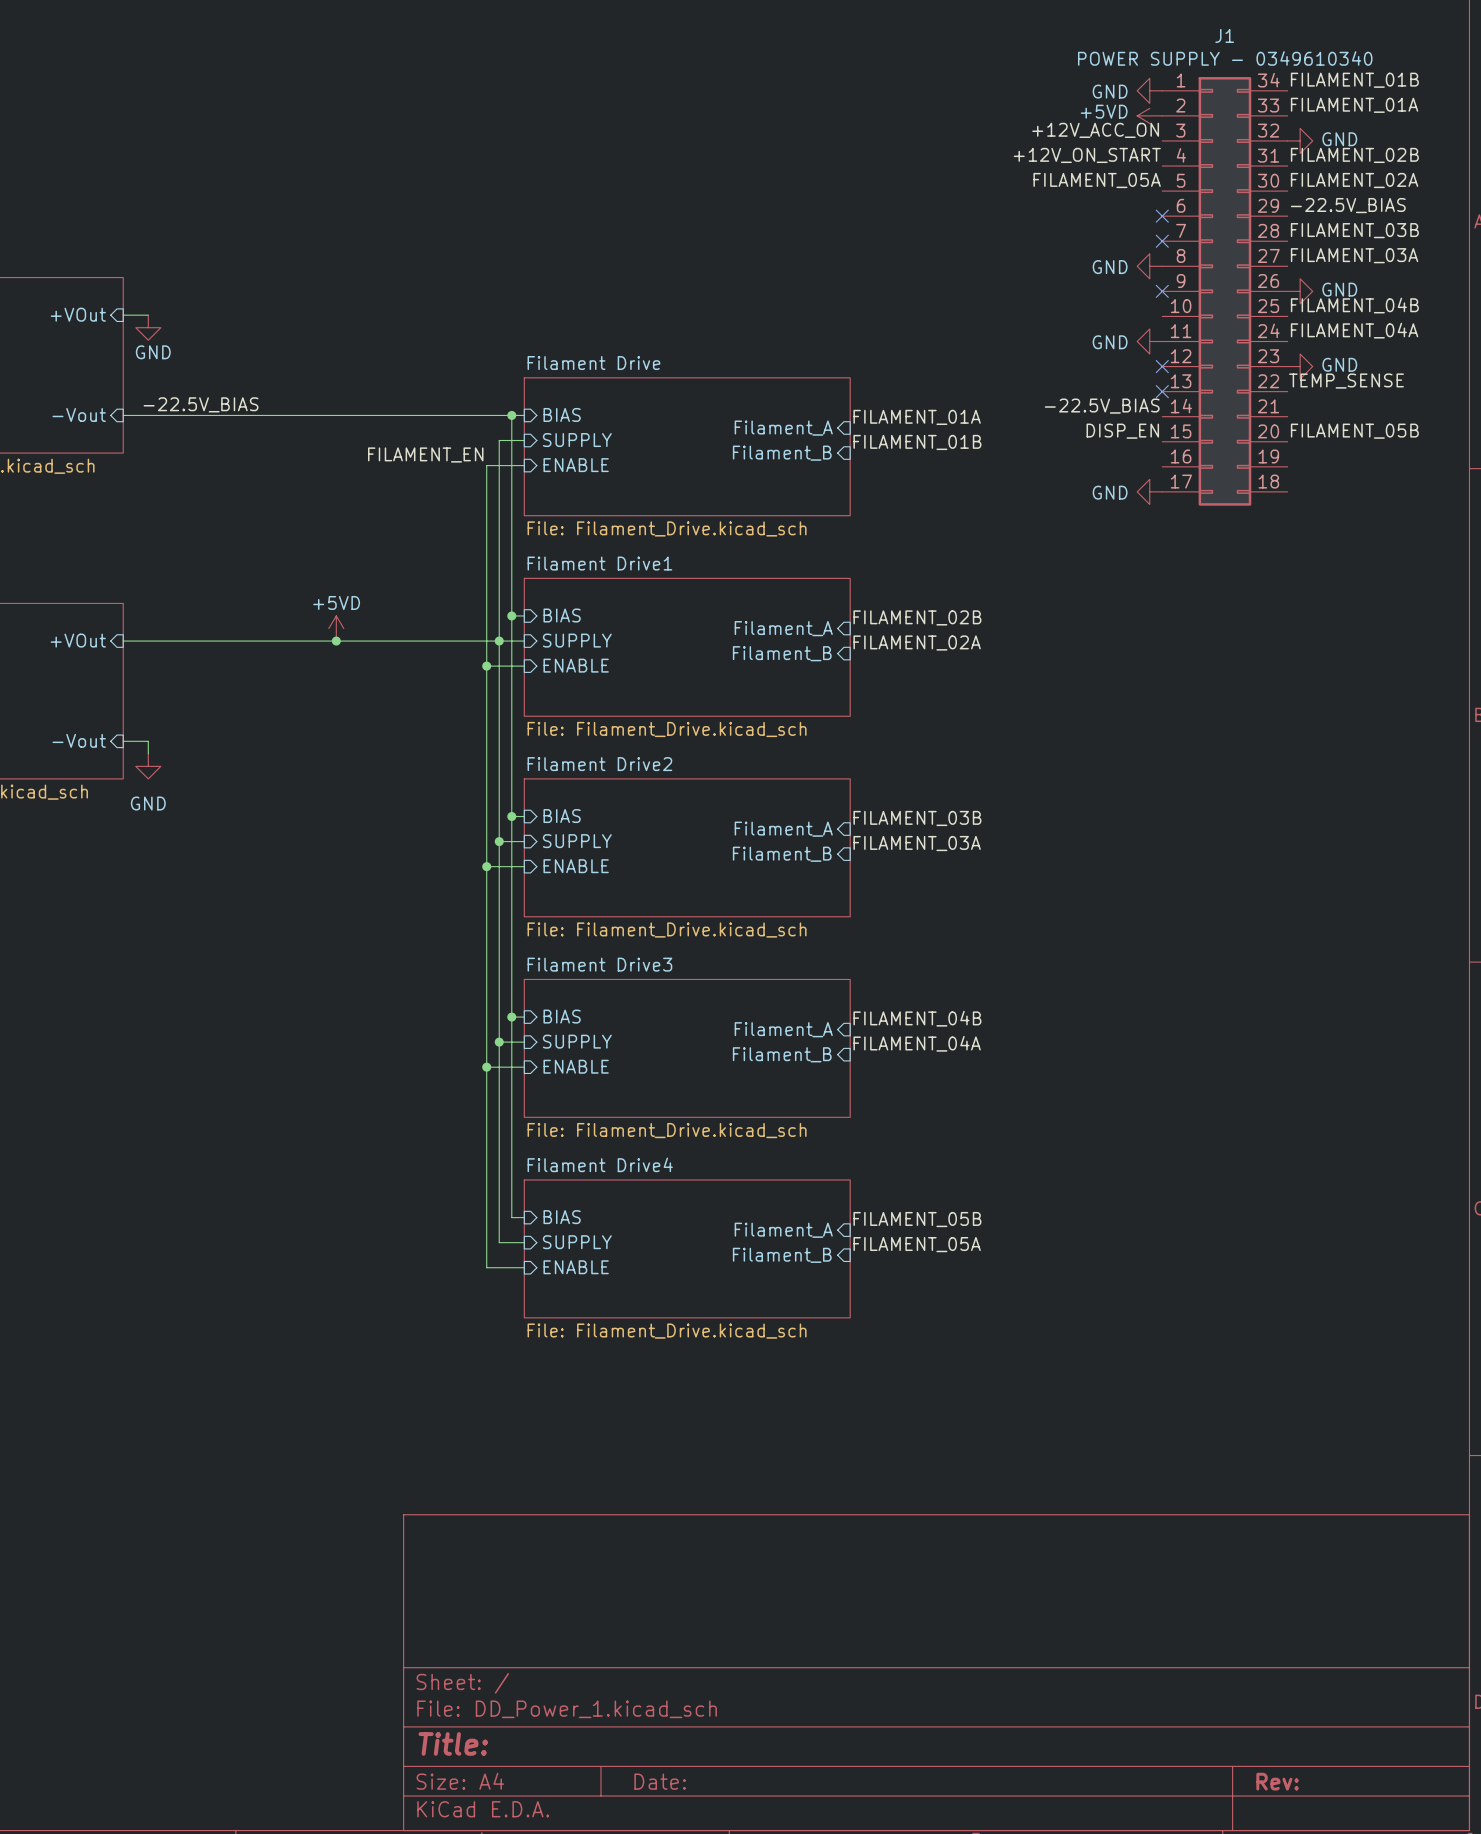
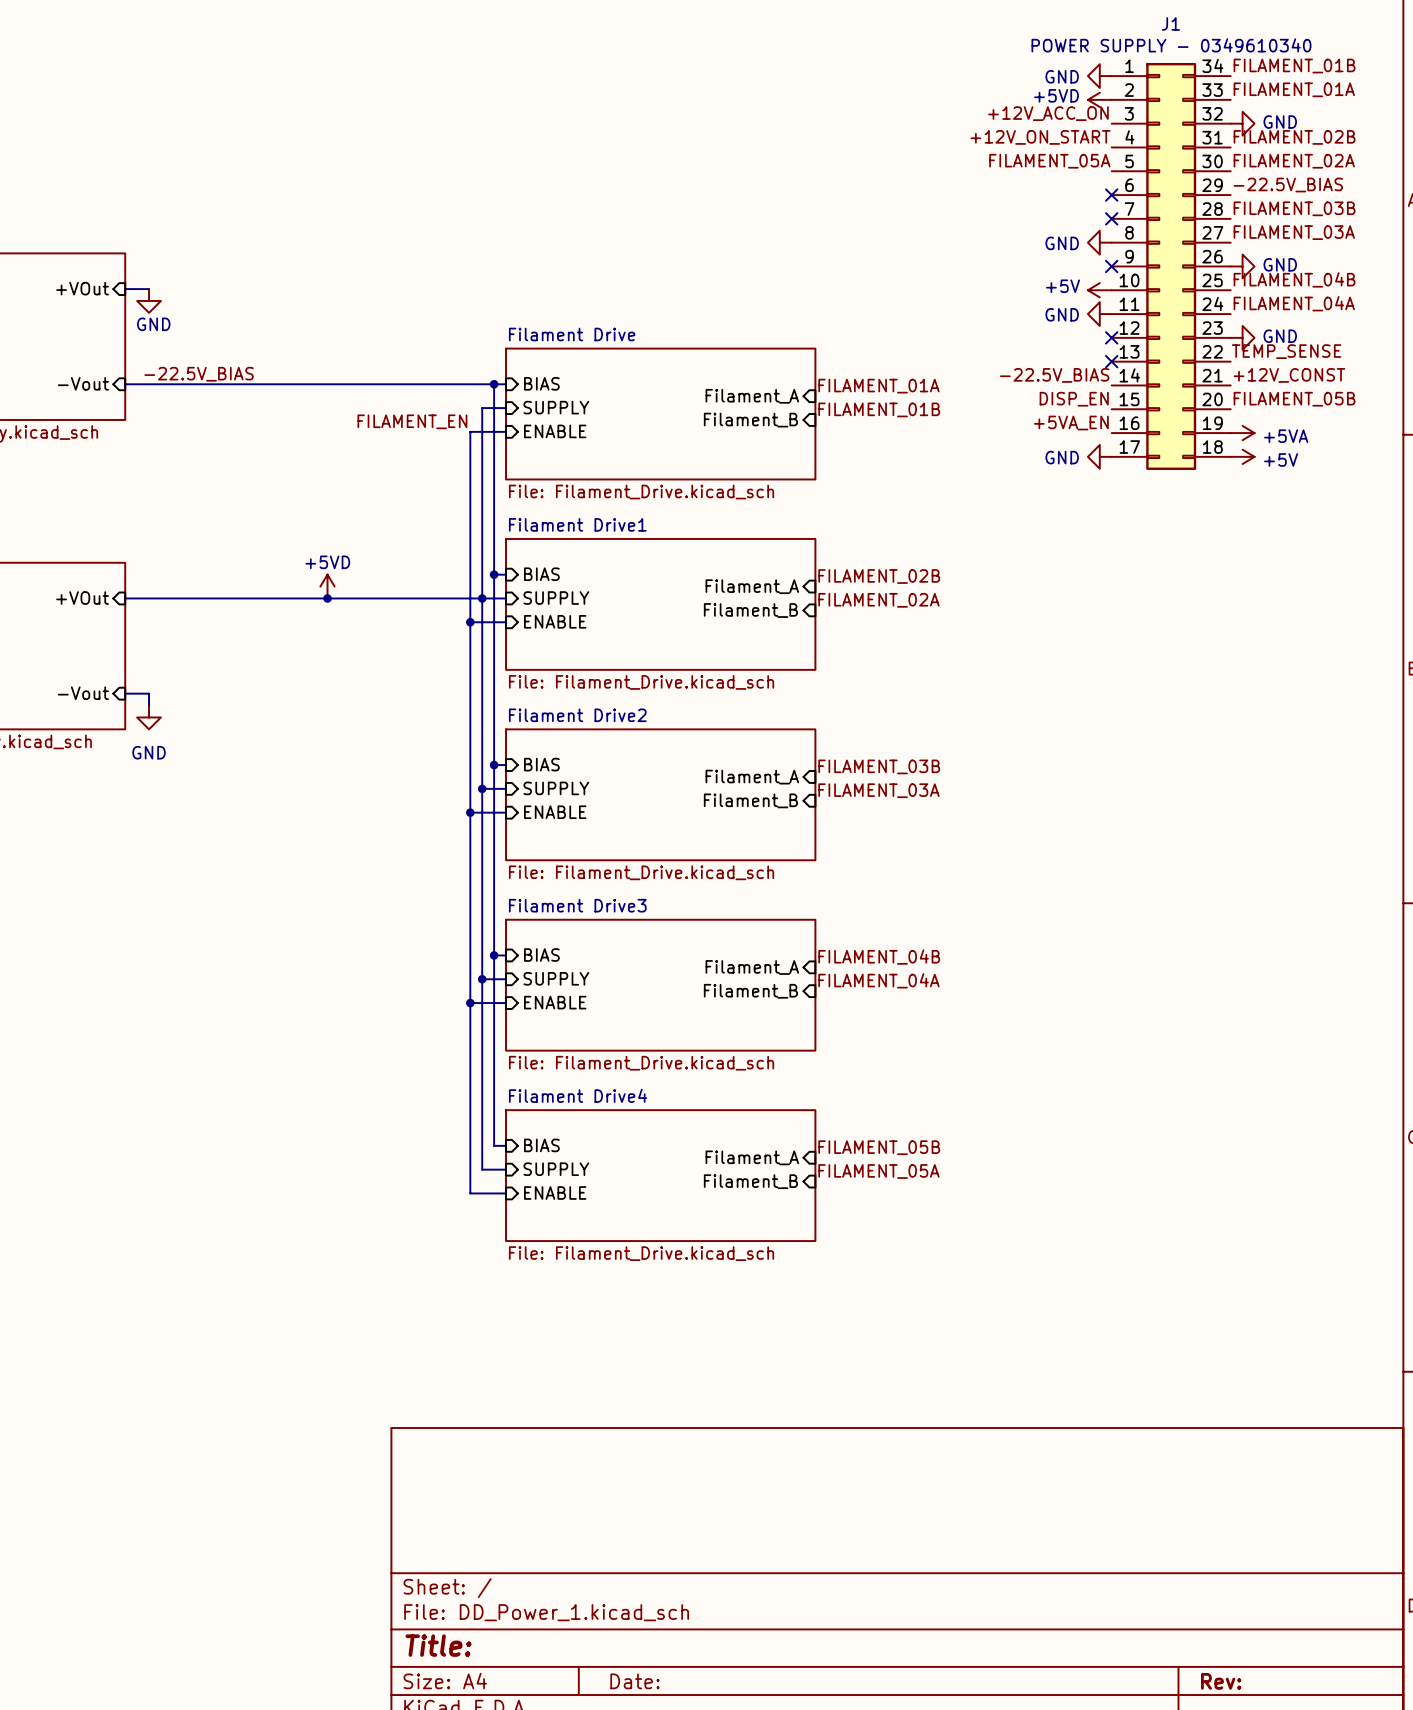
power symbol: none -> +5V (1099, 290)
label: none -> +12V_CONST (1289, 375)
label: none -> +5VA_EN (1071, 423)
power symbol: none -> +5VA (1242, 433)
power symbol: none -> +5V (1242, 456)

